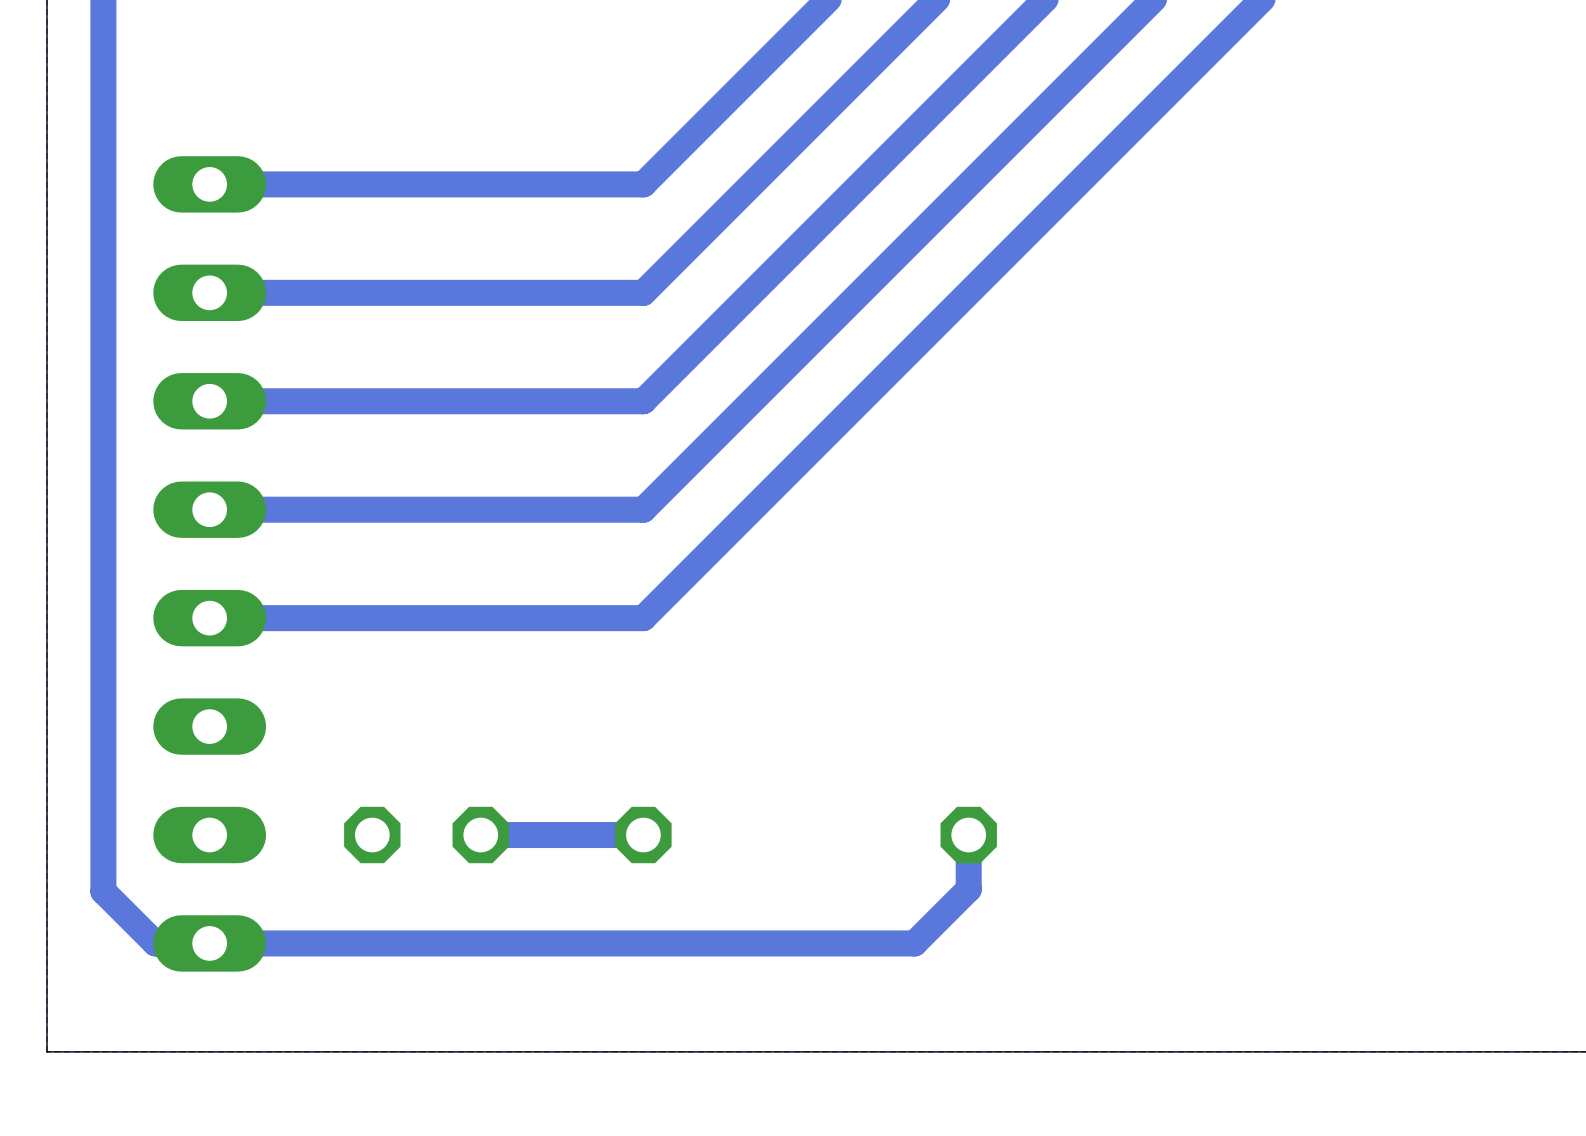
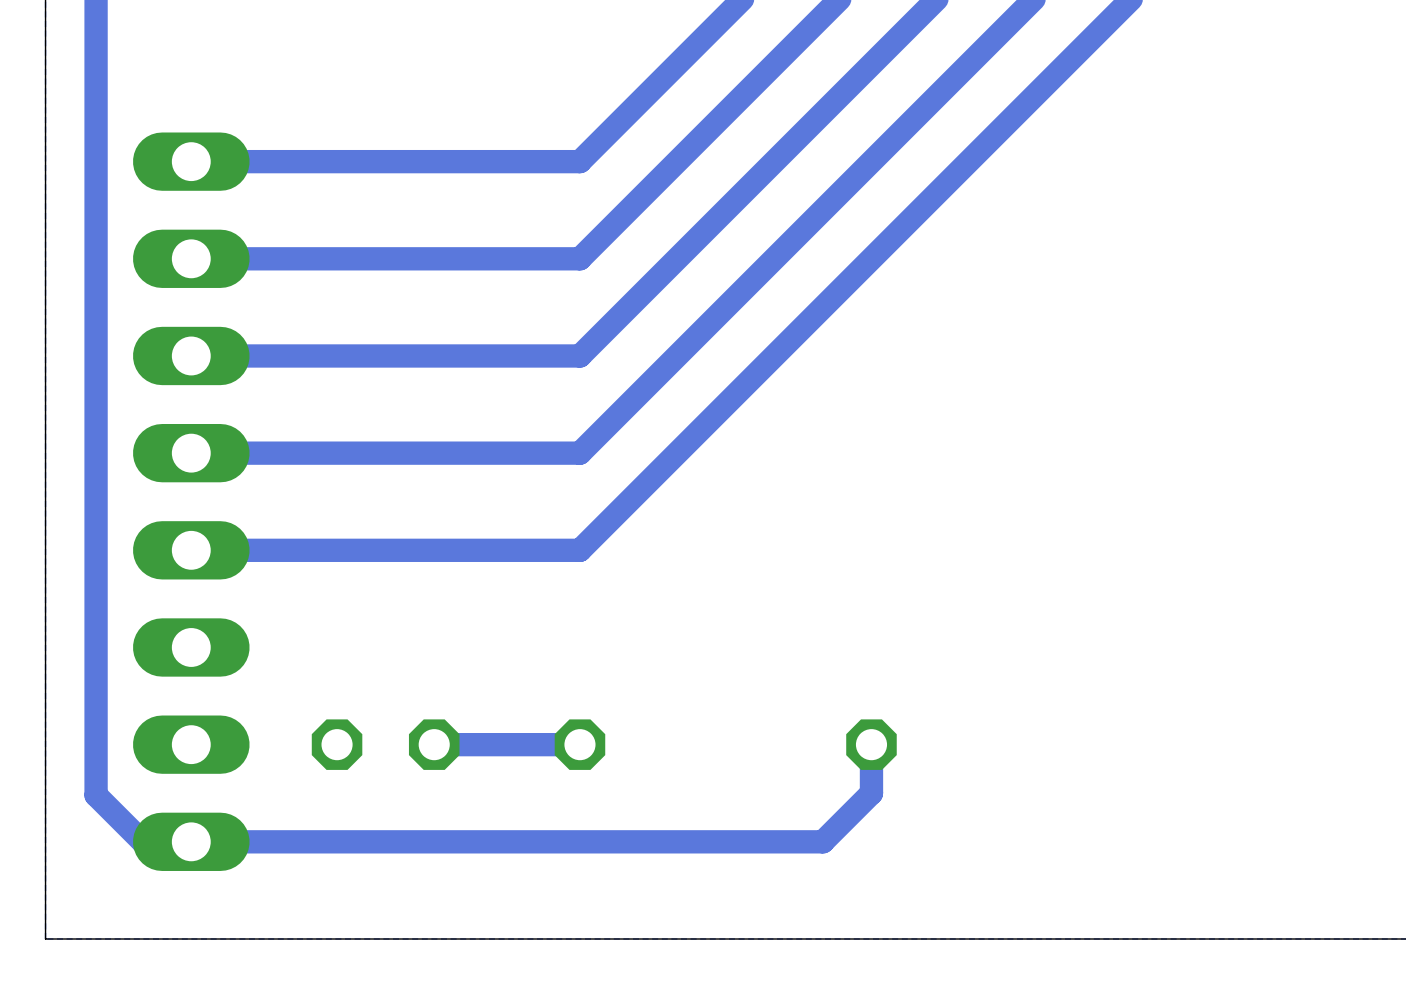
part footprint: [153, 156, 267, 972] -> [132, 132, 250, 871]

